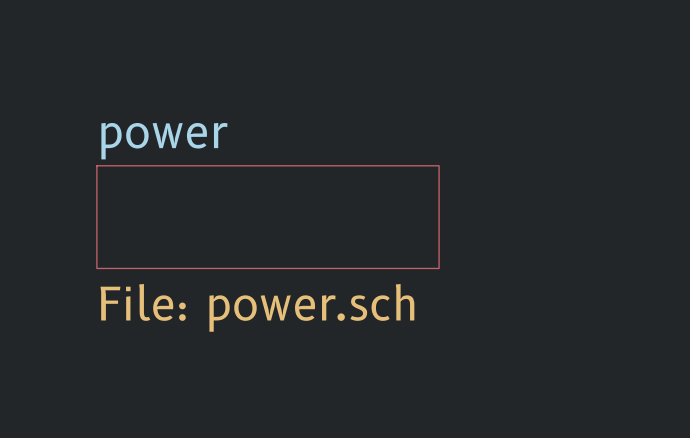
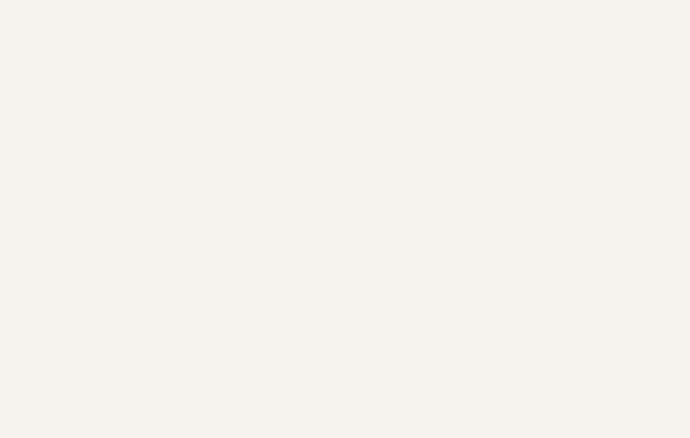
sheet power: File: power.sch (267, 217) -> none

